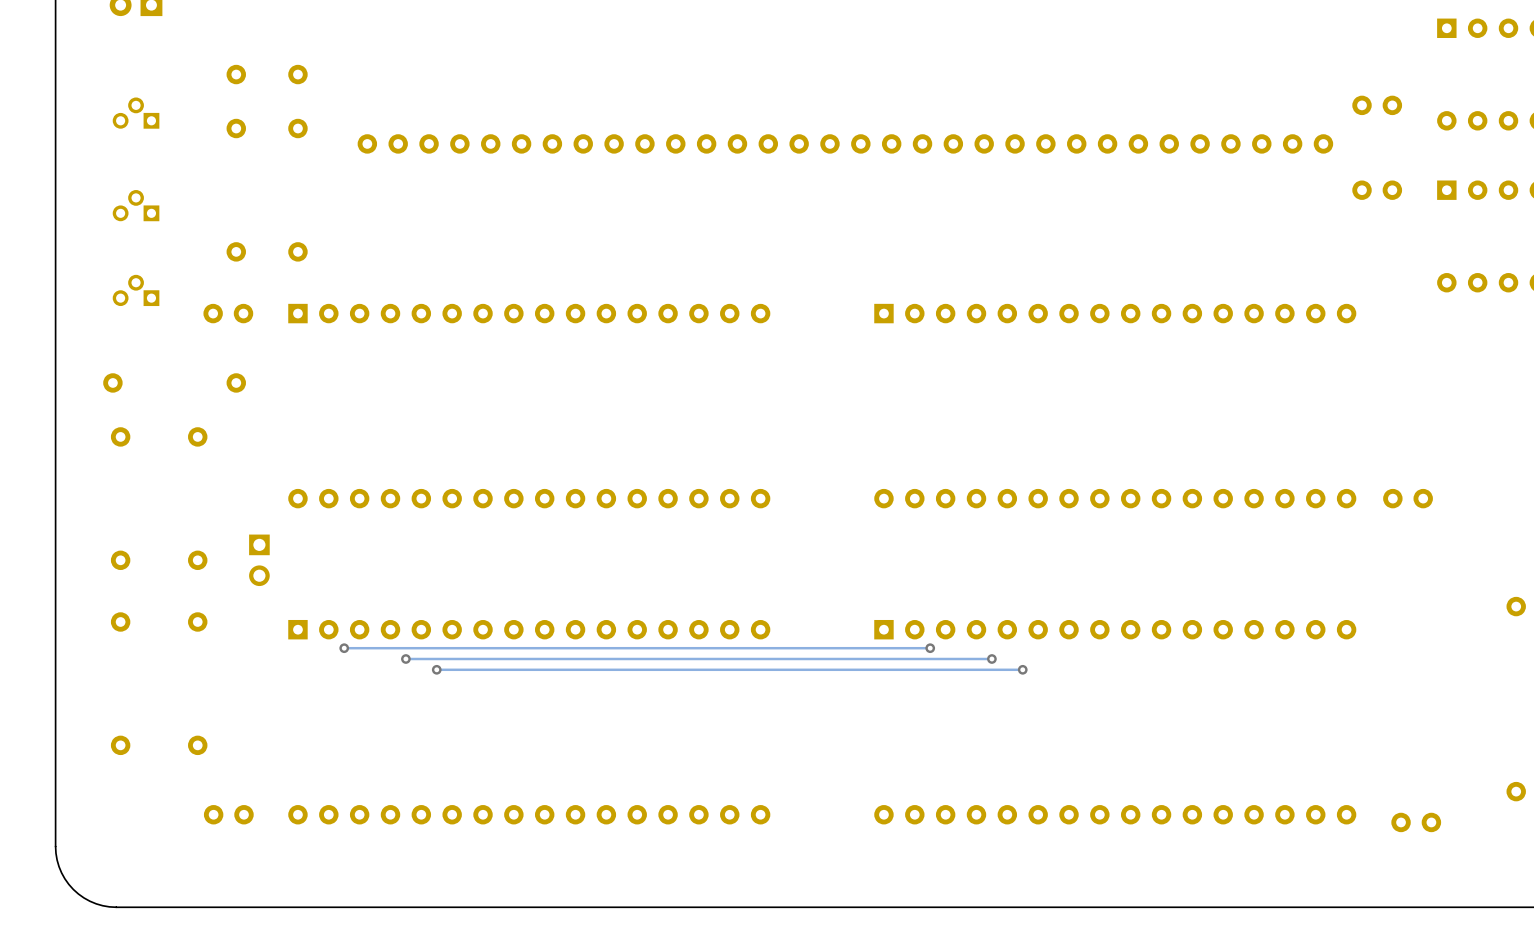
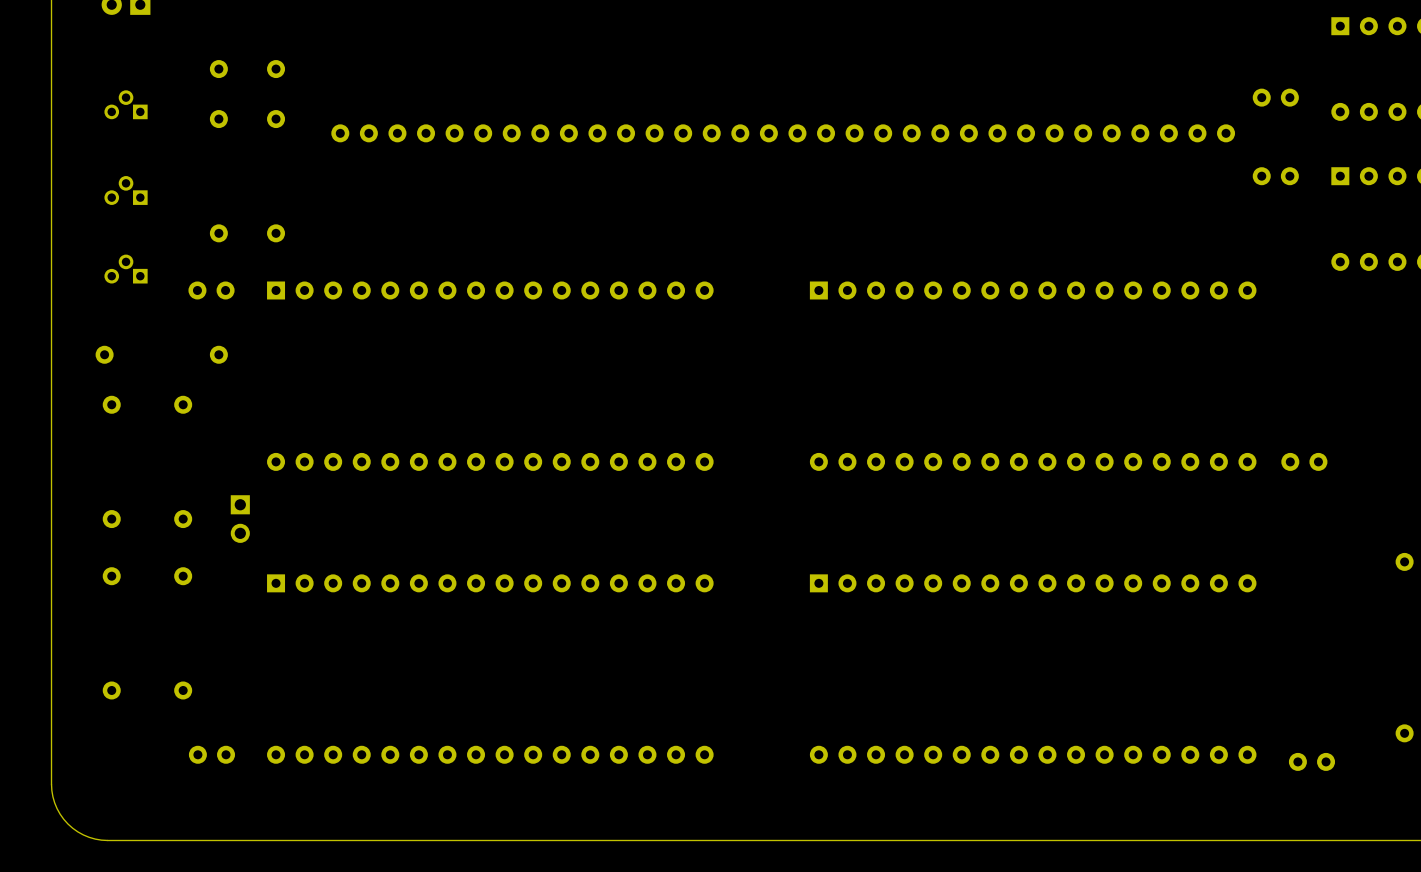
via: (344, 648) -> none
track: (930, 648) (344, 648) -> none
via: (930, 648) -> none
via: (405, 658) -> none
track: (991, 658) (405, 658) -> none
via: (991, 658) -> none
via: (436, 669) -> none
track: (1022, 669) (436, 669) -> none
via: (1022, 669) -> none

